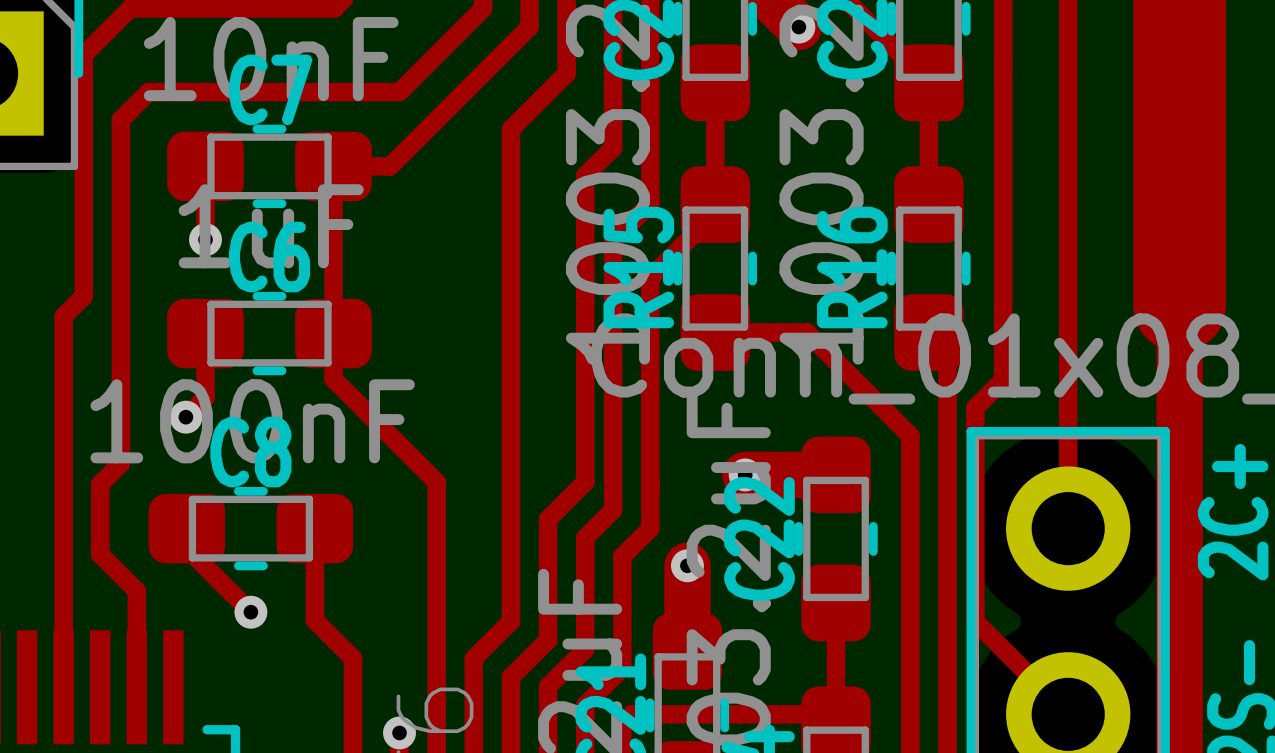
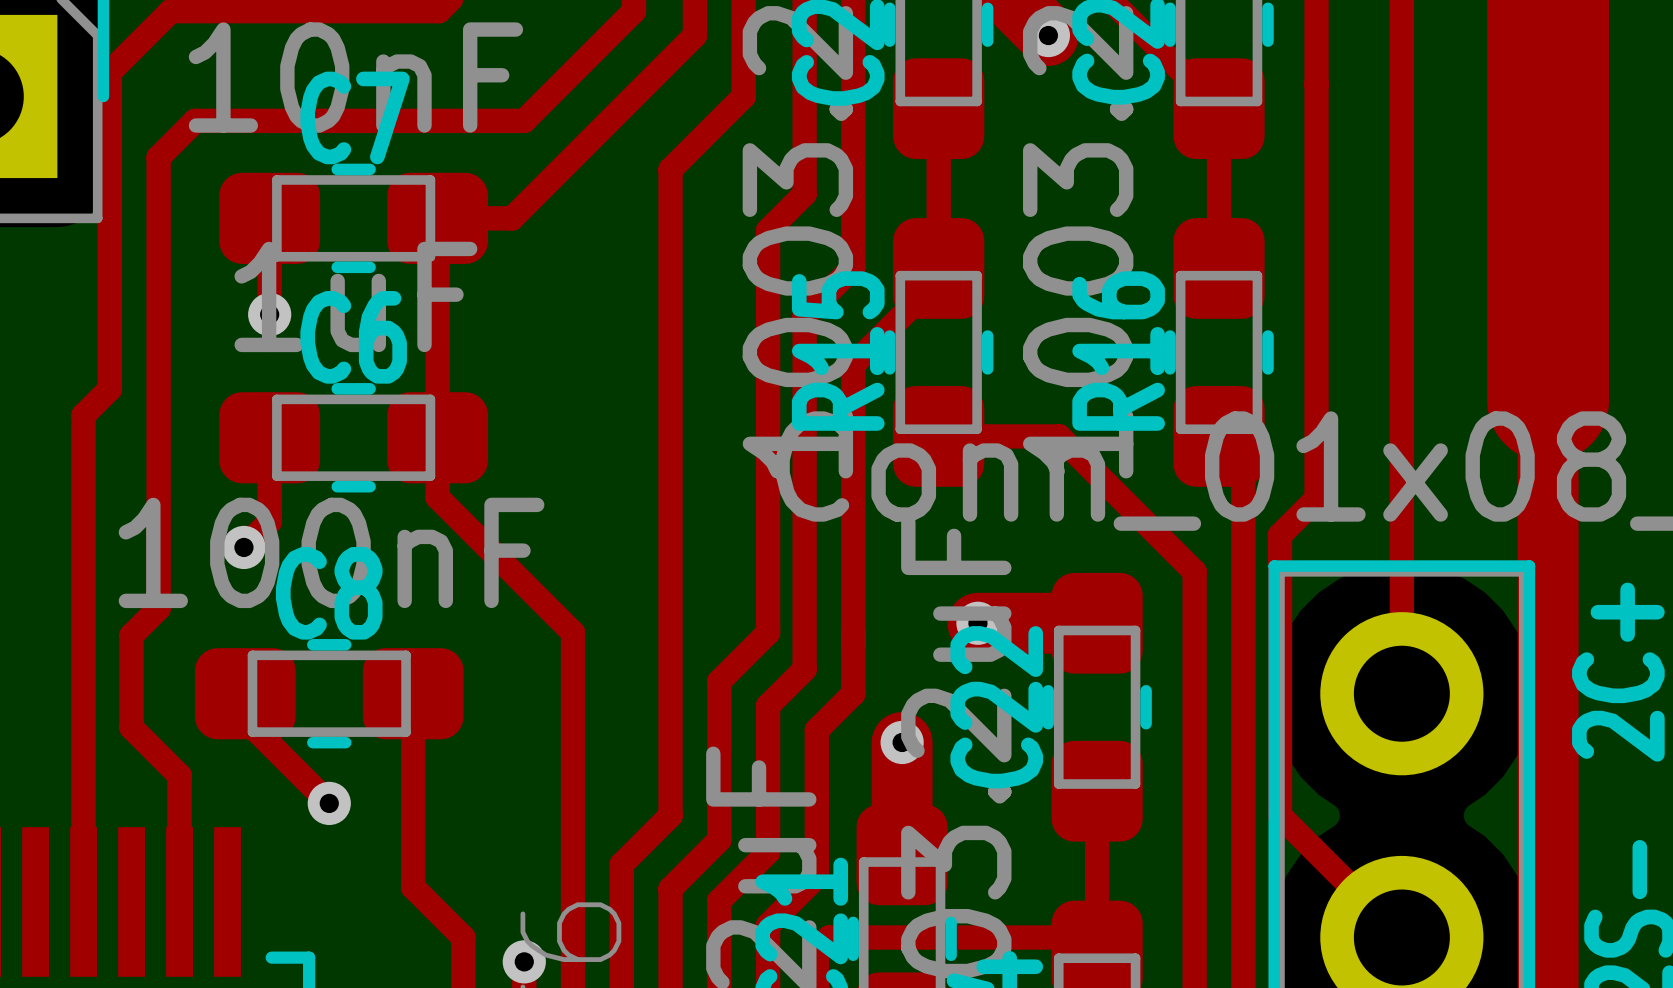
top track: (314, 620) (353, 658) (353, 714) -> (413, 814) (413, 887) (463, 937)

